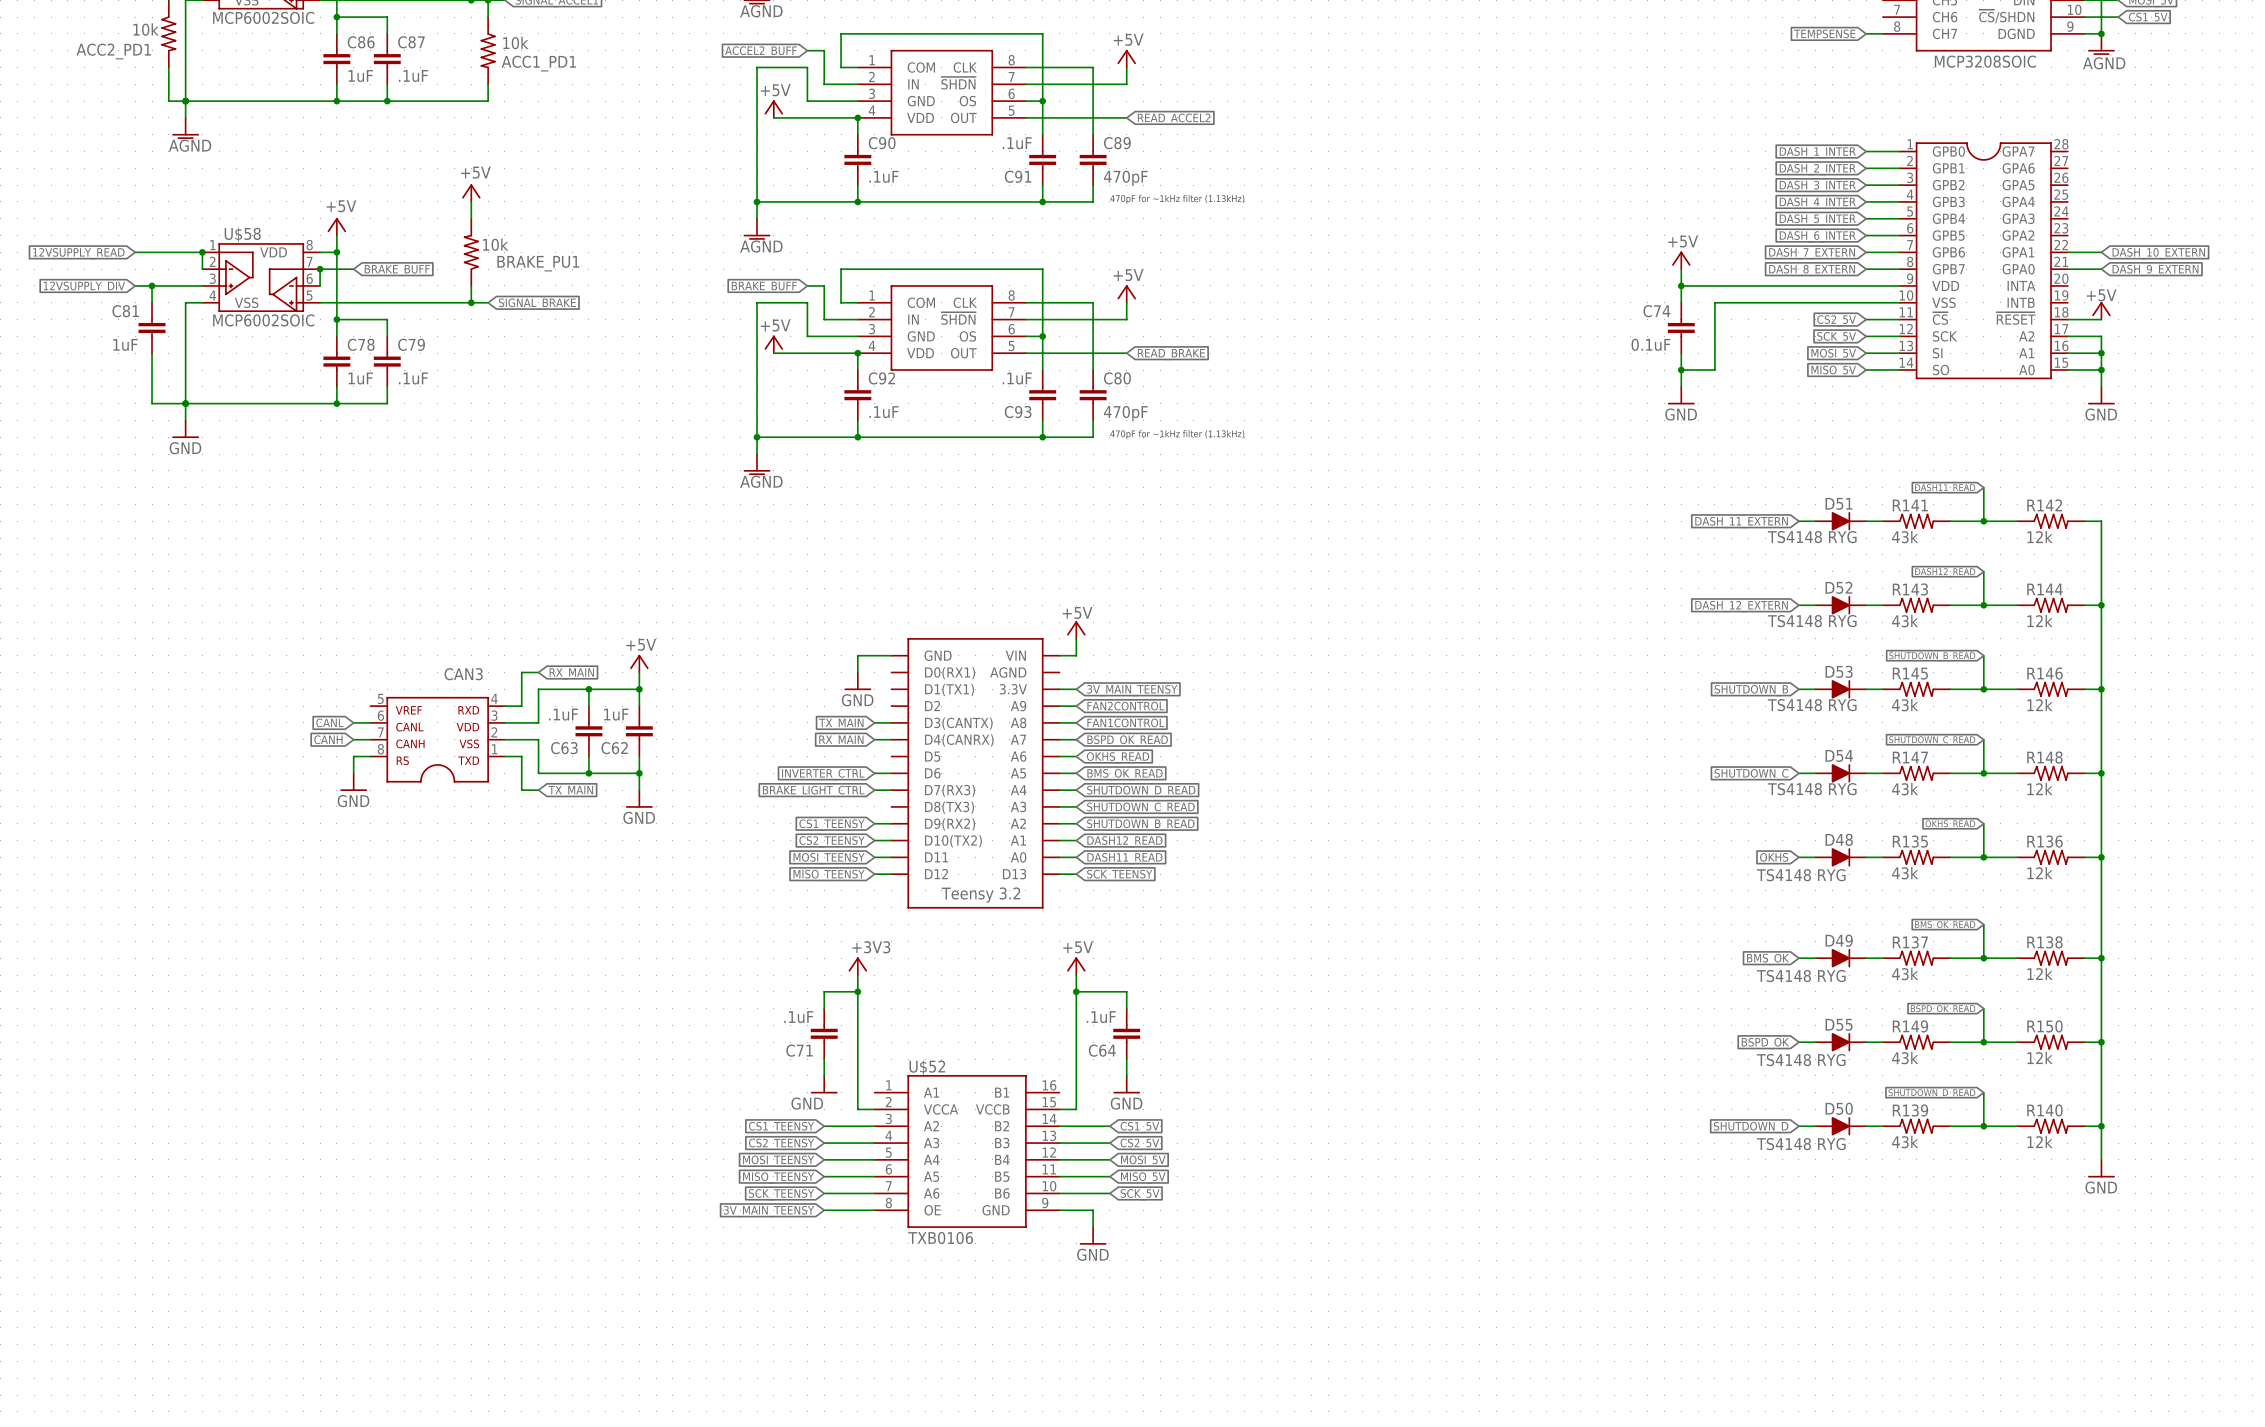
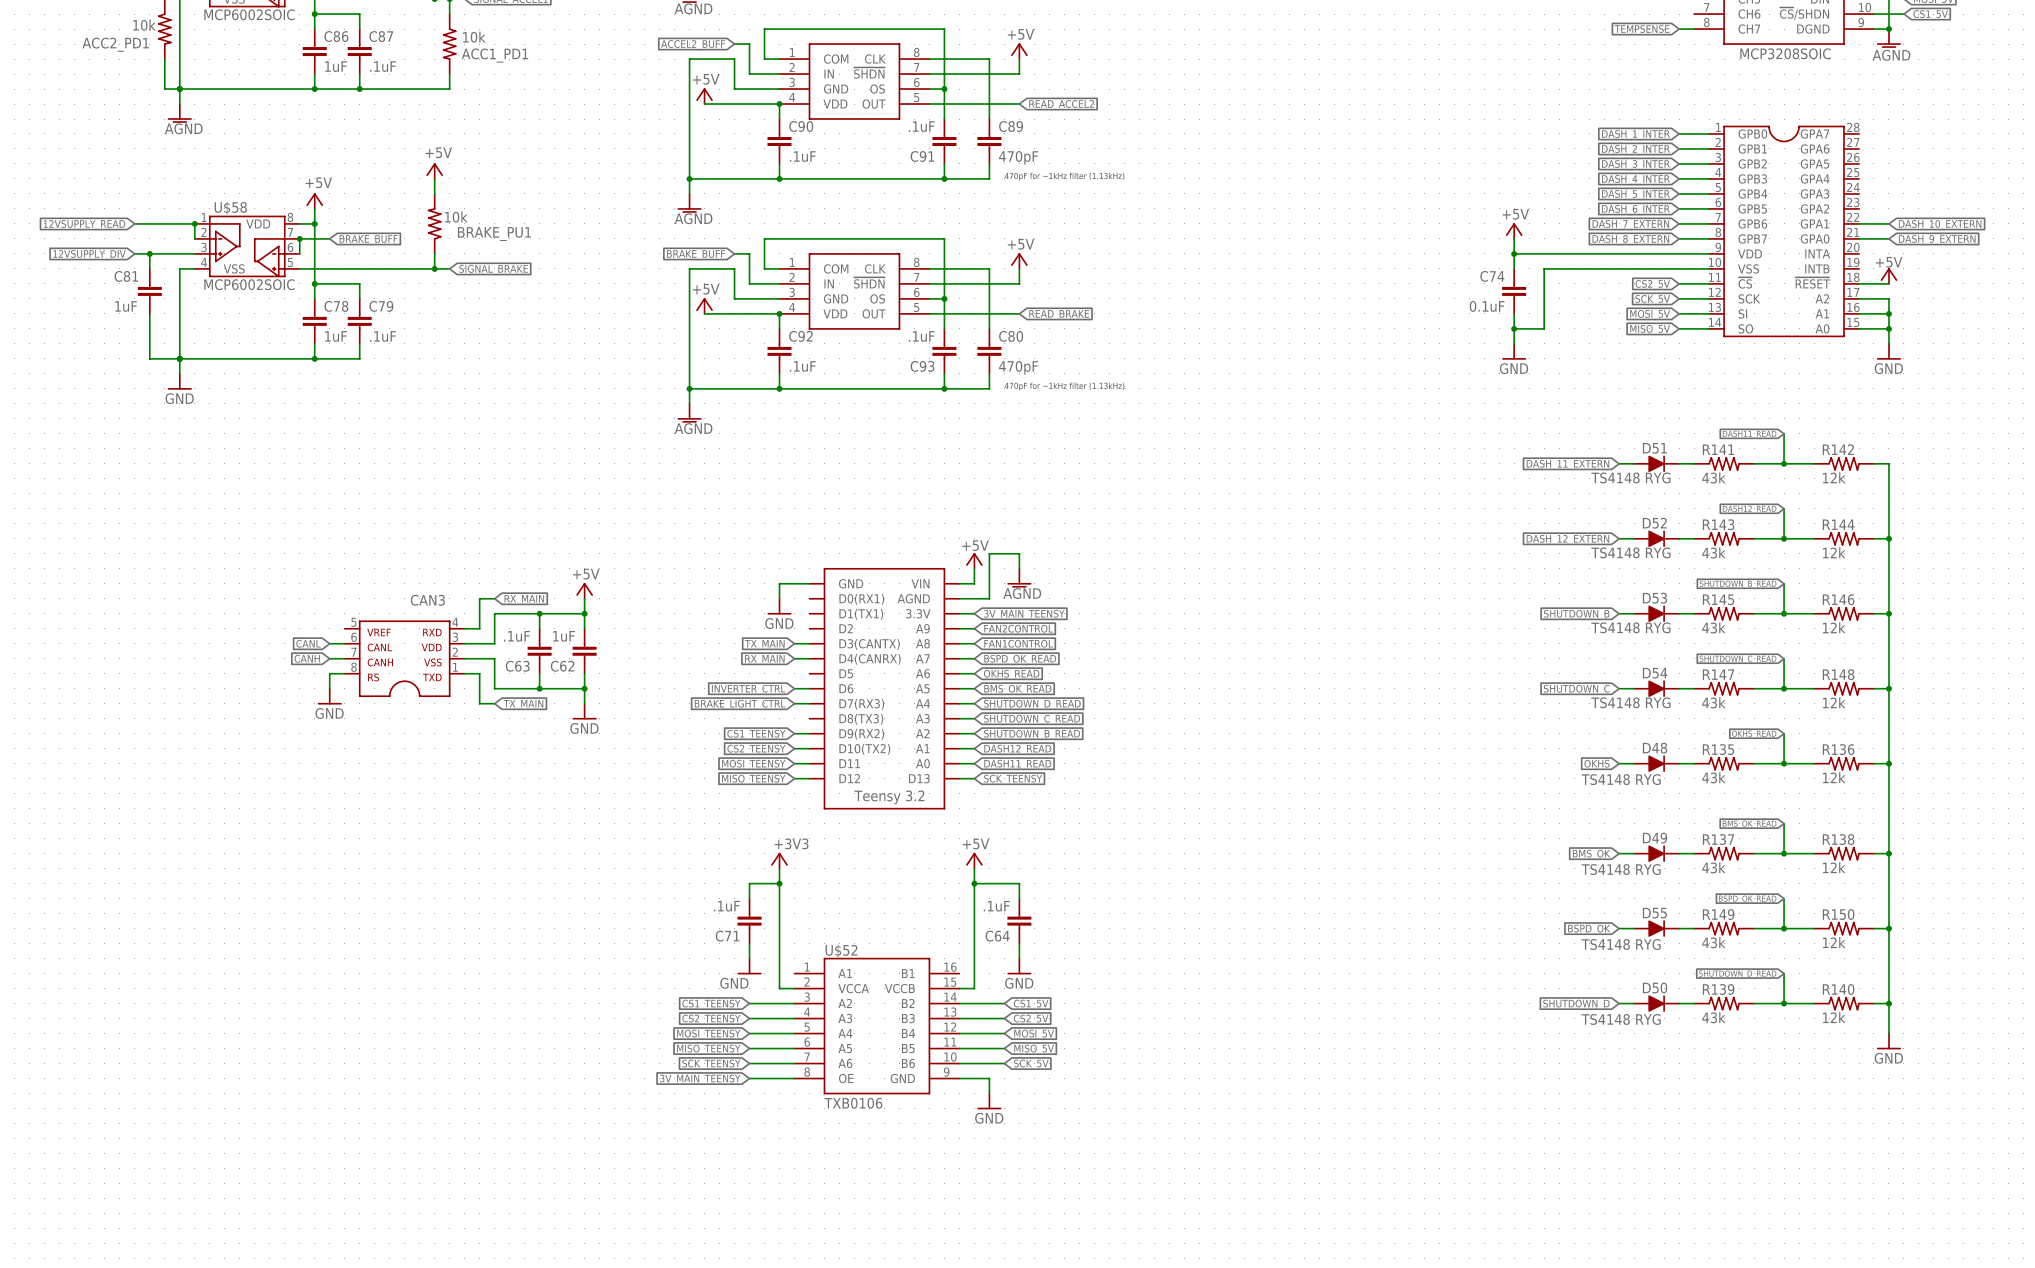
wire: none -> (1019, 568) (1019, 553) (989, 553) (989, 598) (959, 598)
power symbol: none -> AGND (1019, 578)

